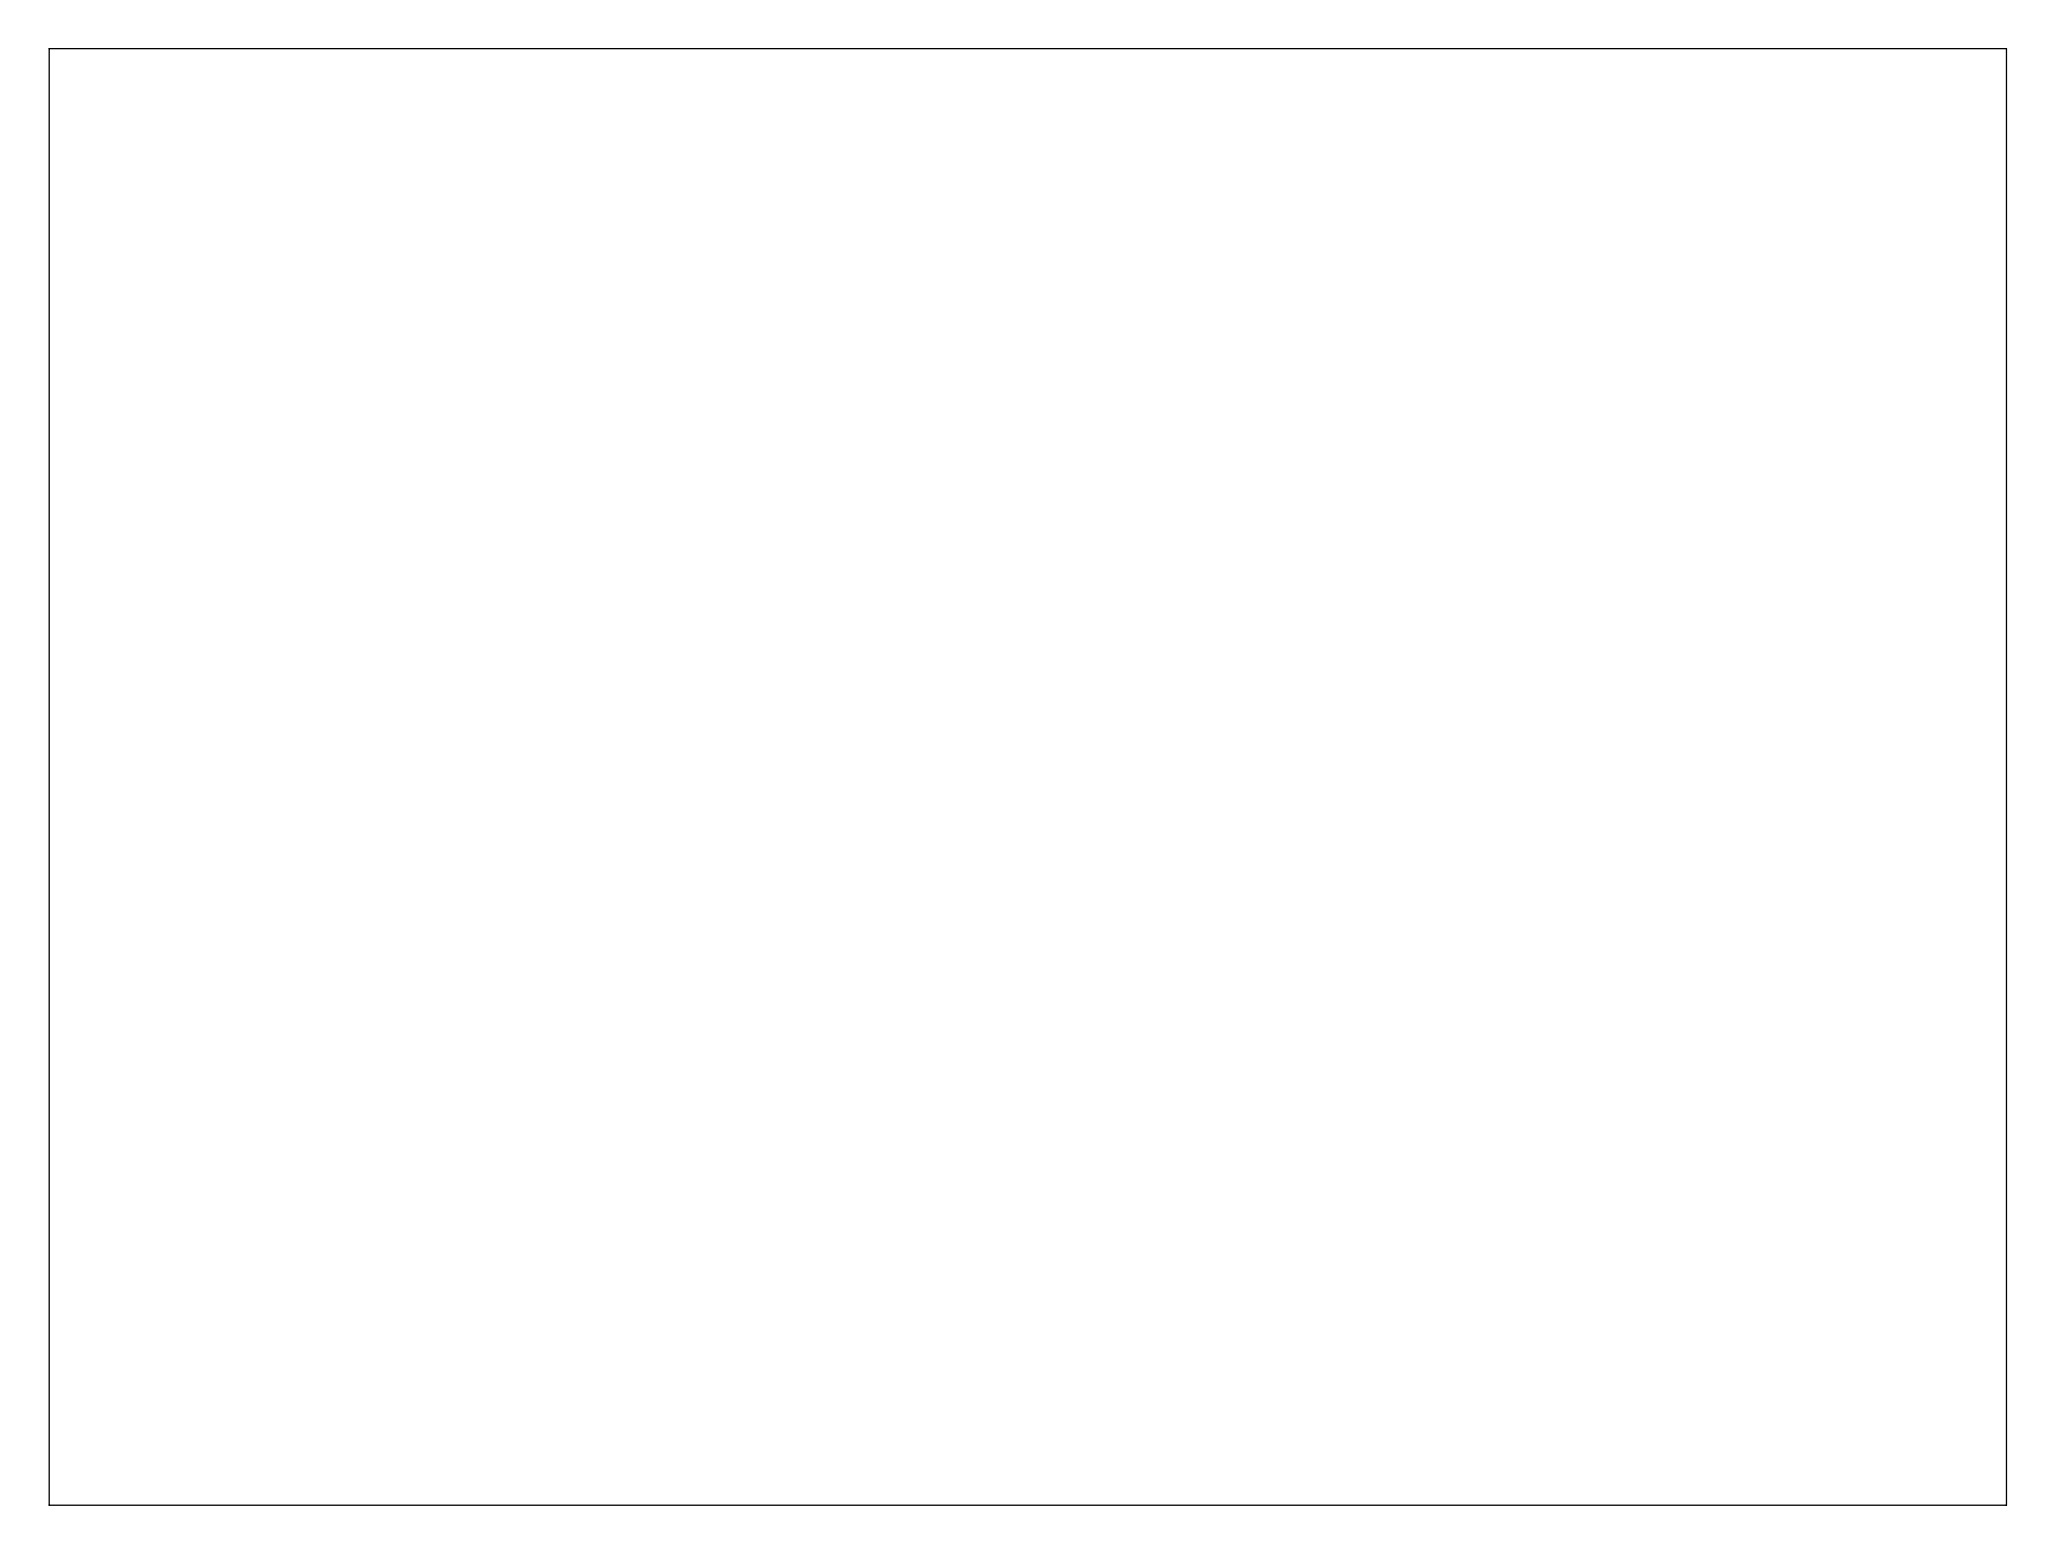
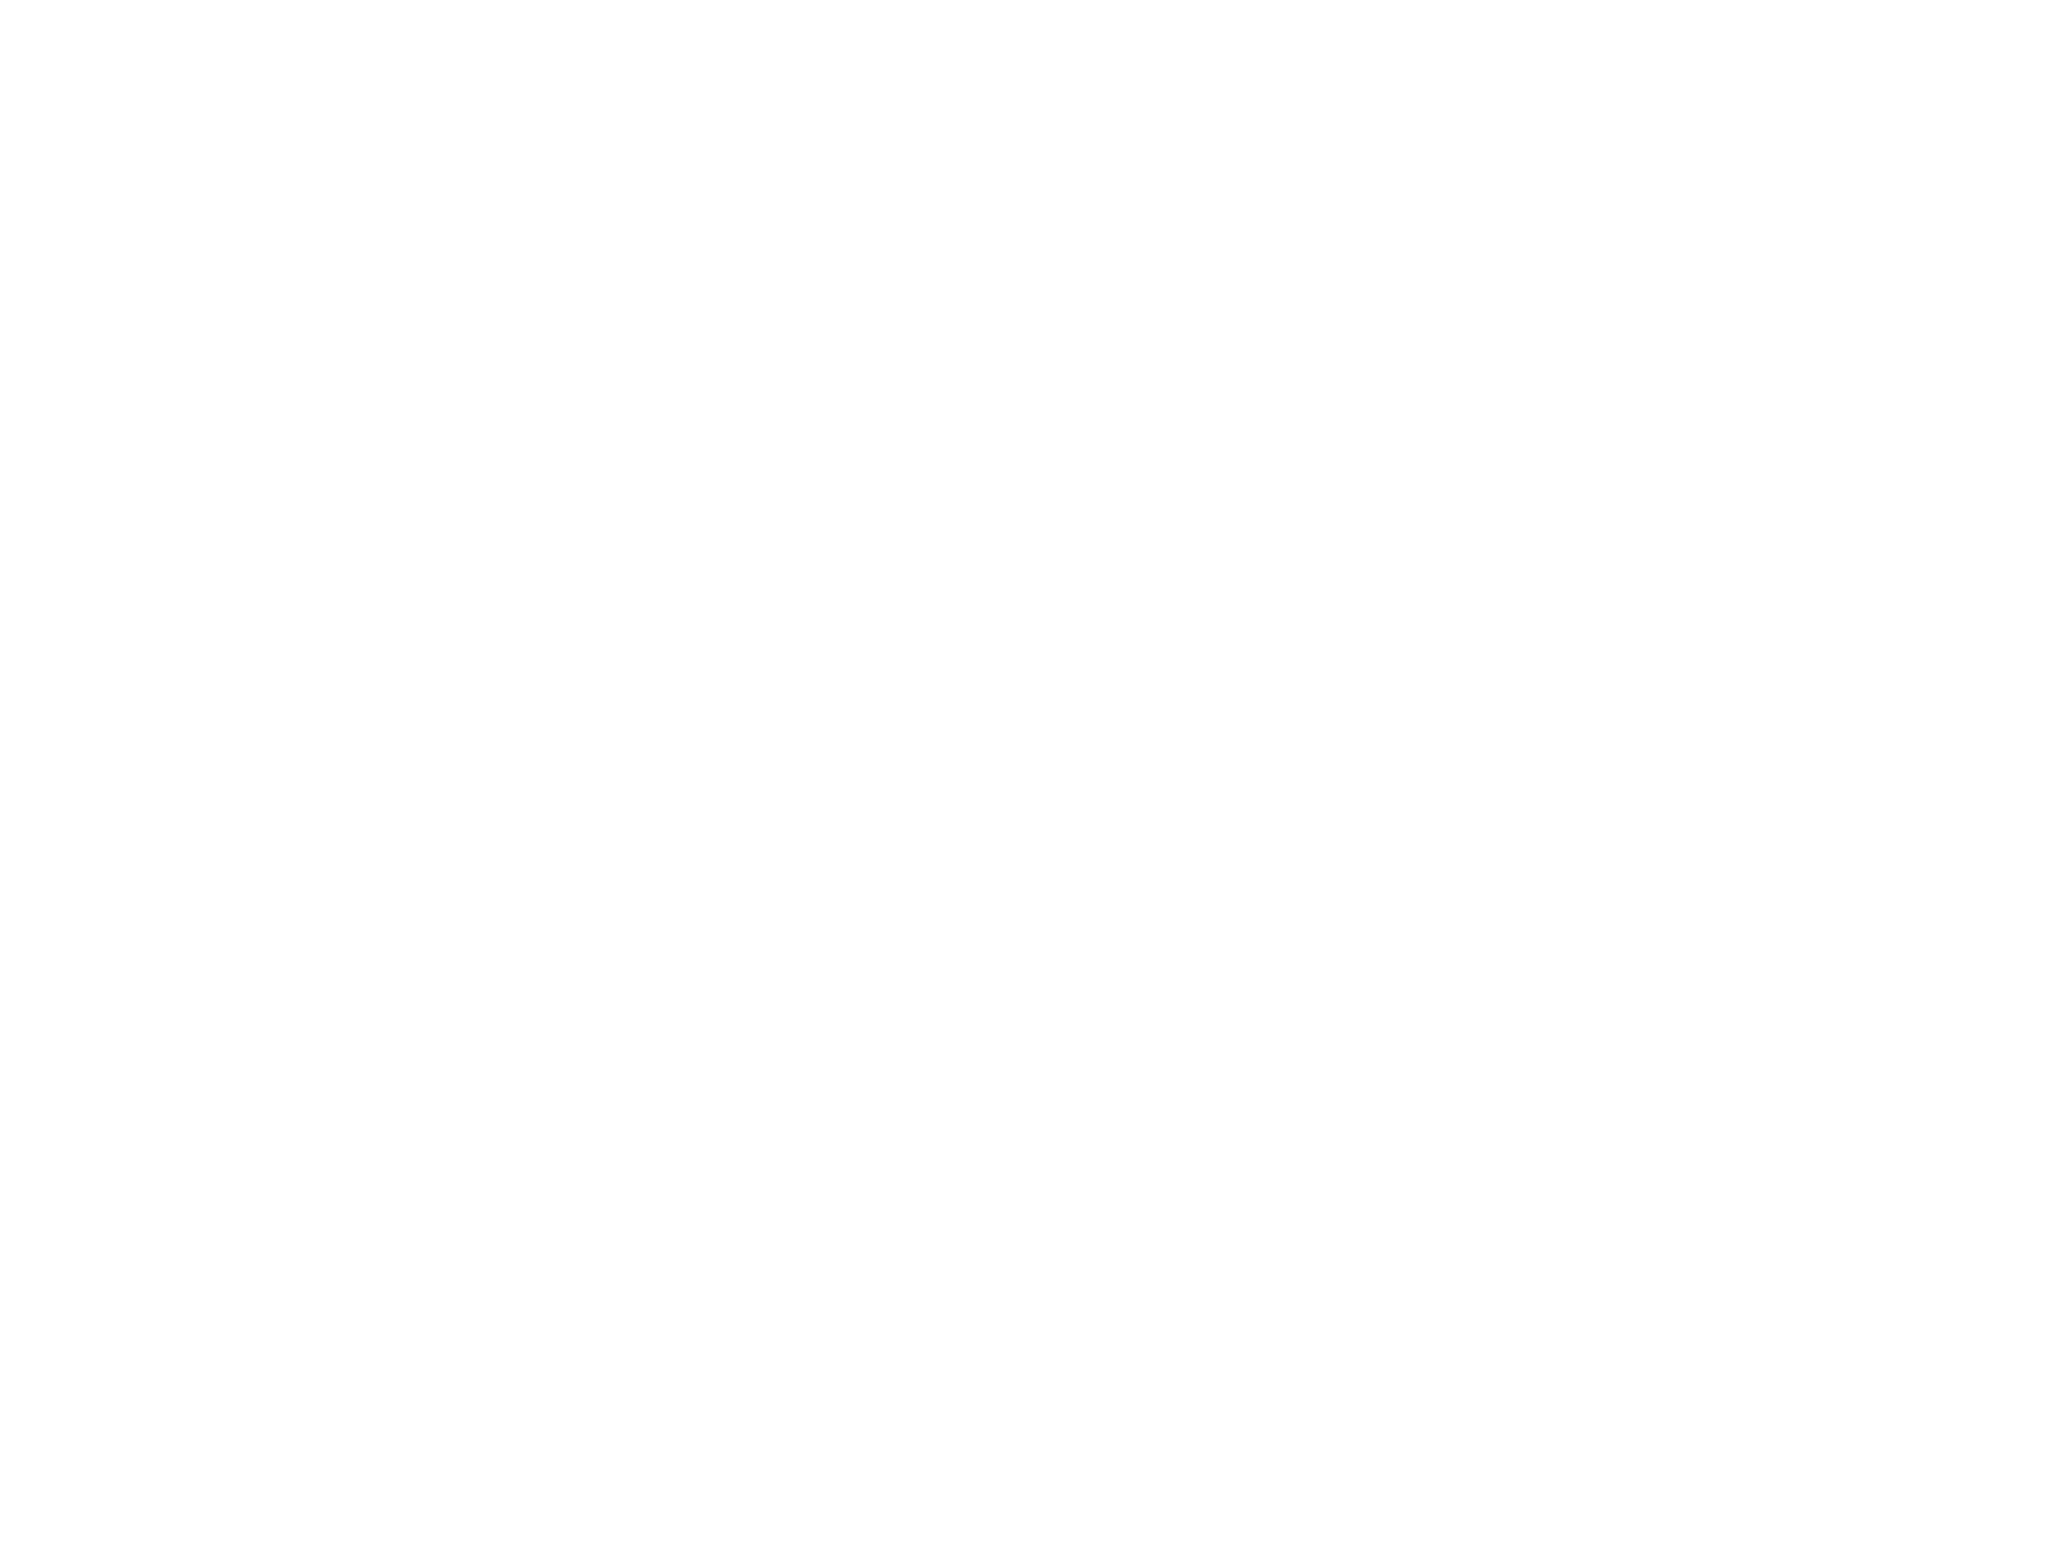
board edge: (2006, 48) (49, 48) (49, 1505) (2006, 1505) (2006, 48) -> none

